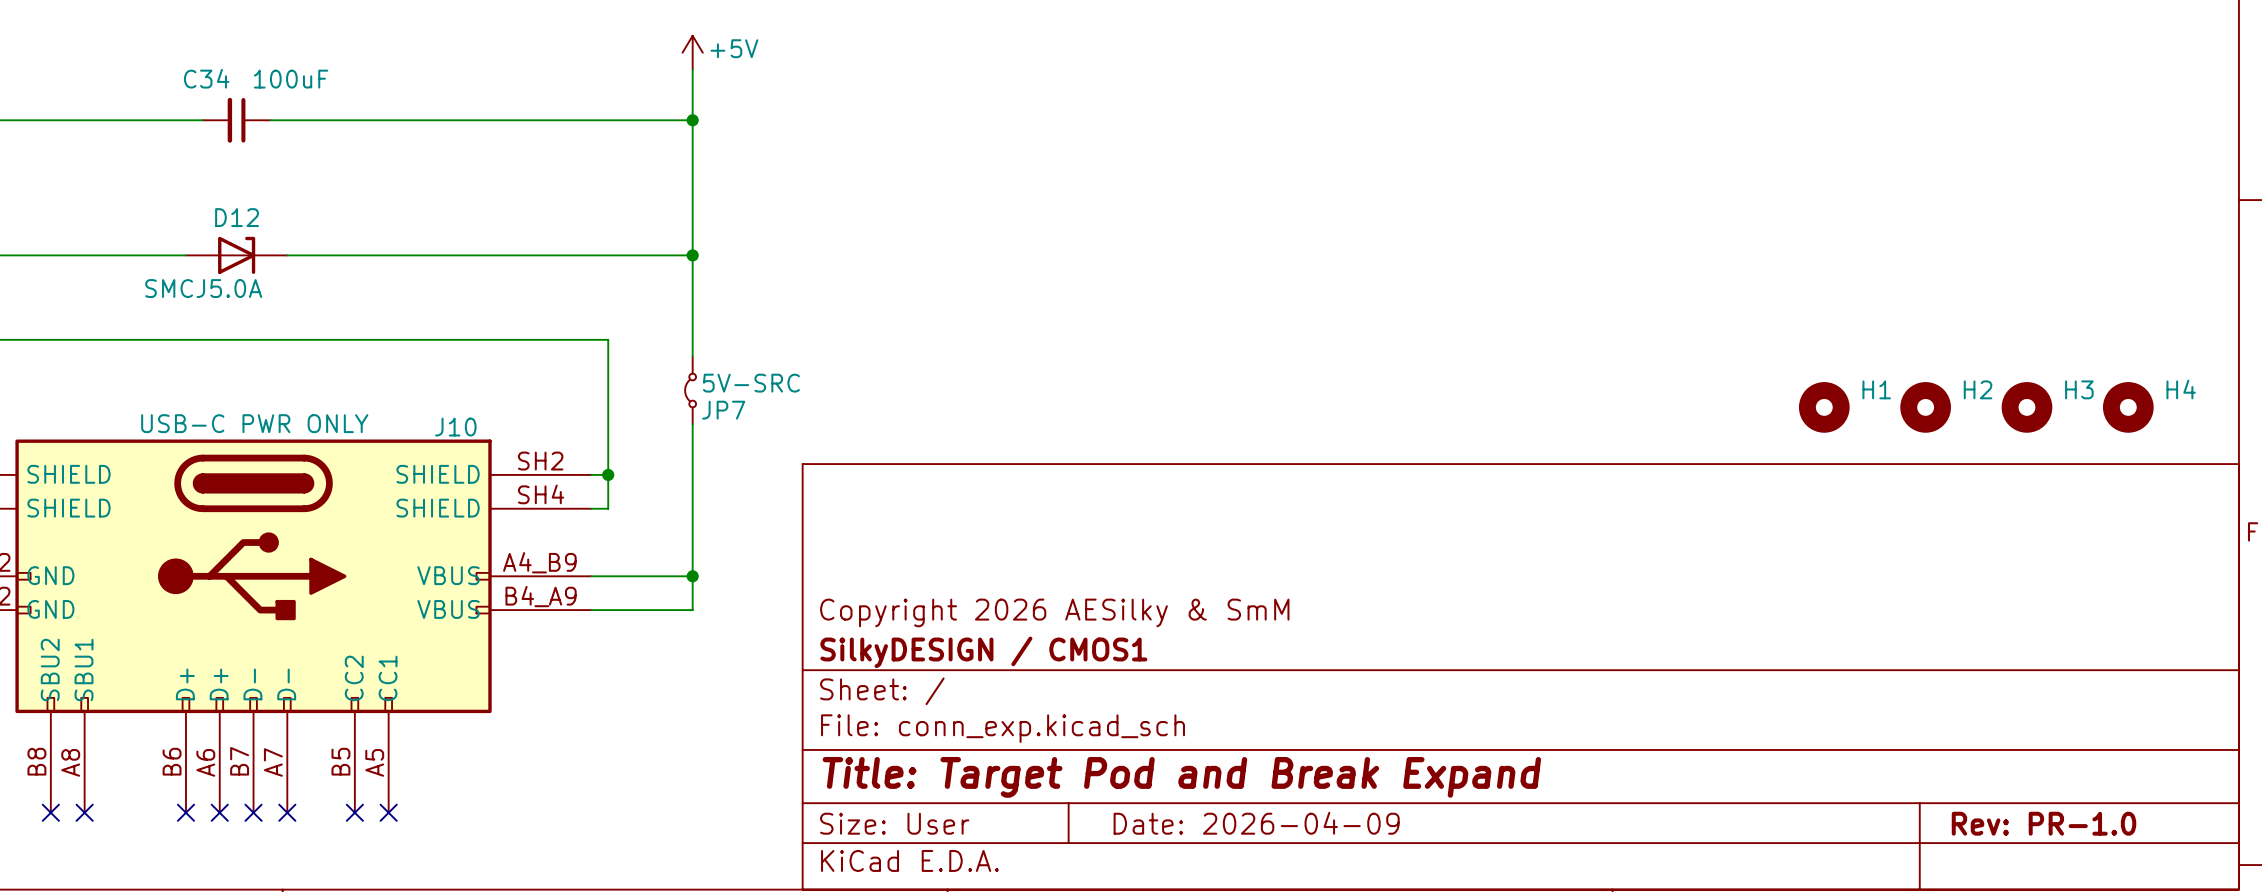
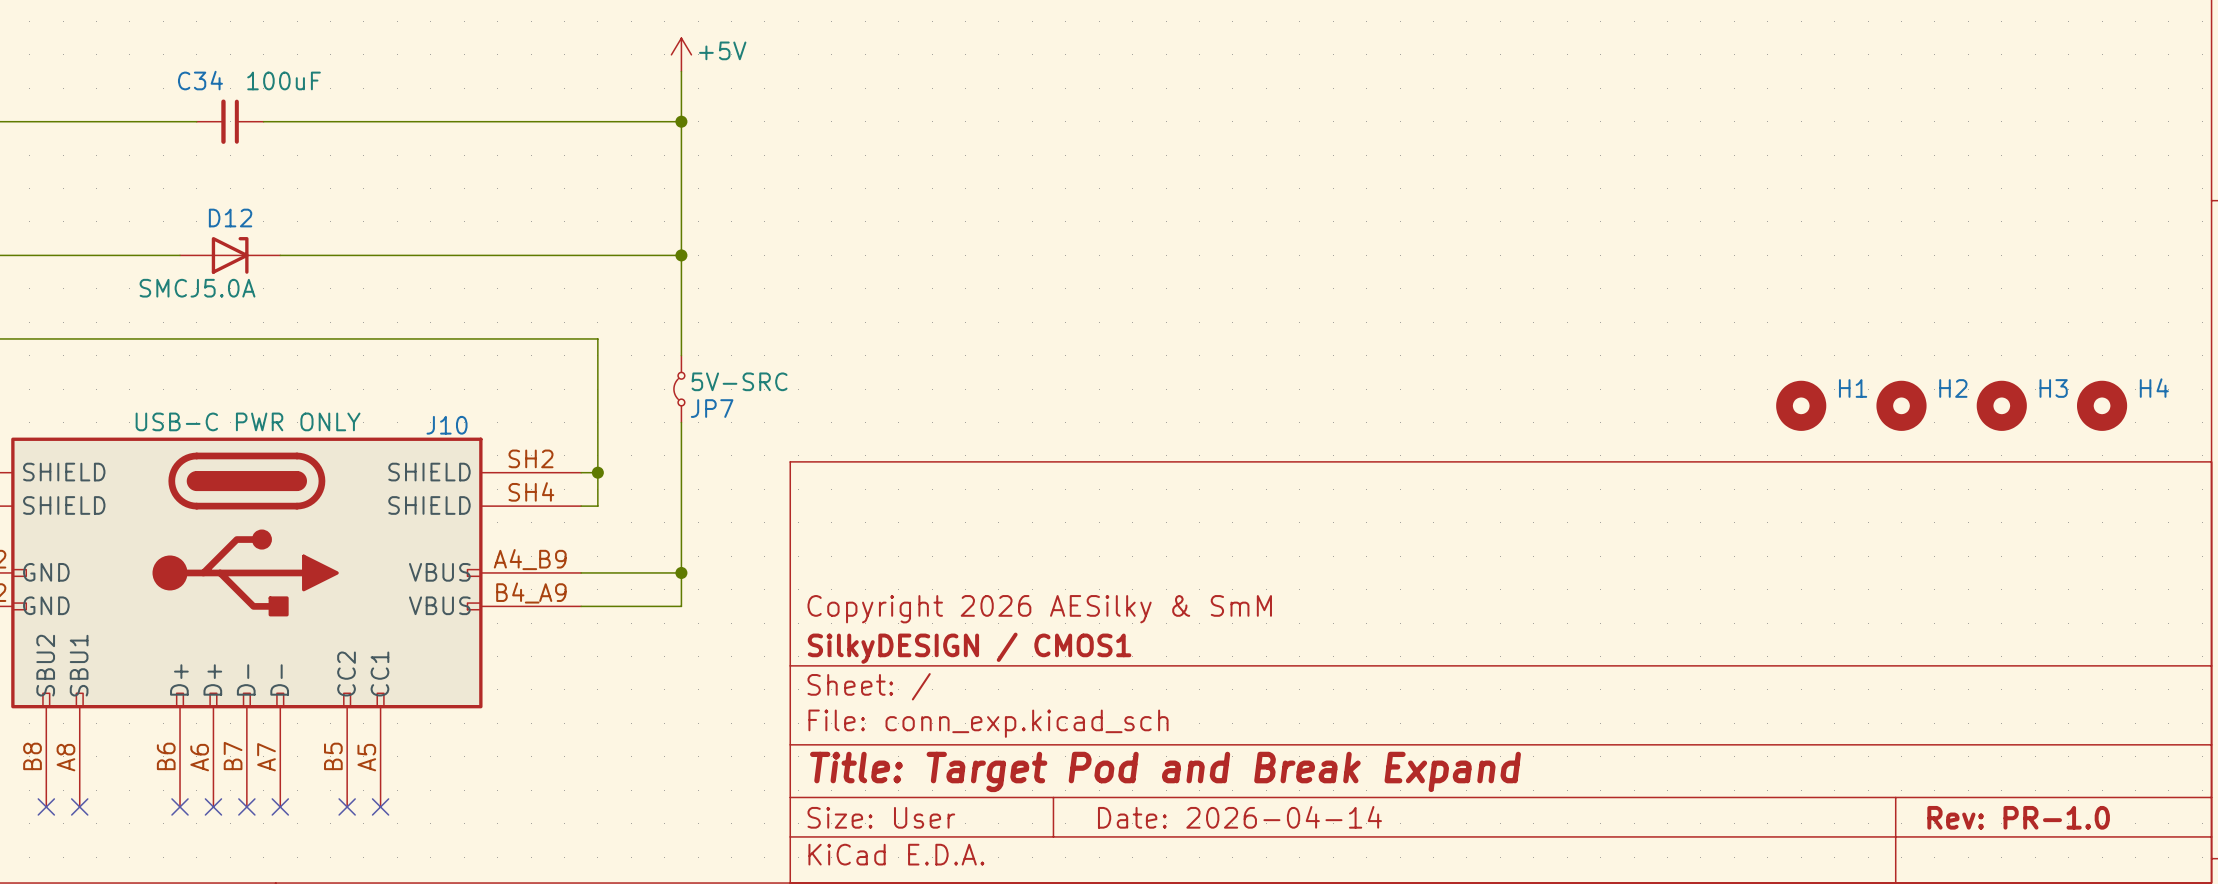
title block: Date: 2026-04-09 (1256, 823) -> Date: 2026-04-14 (1239, 817)

